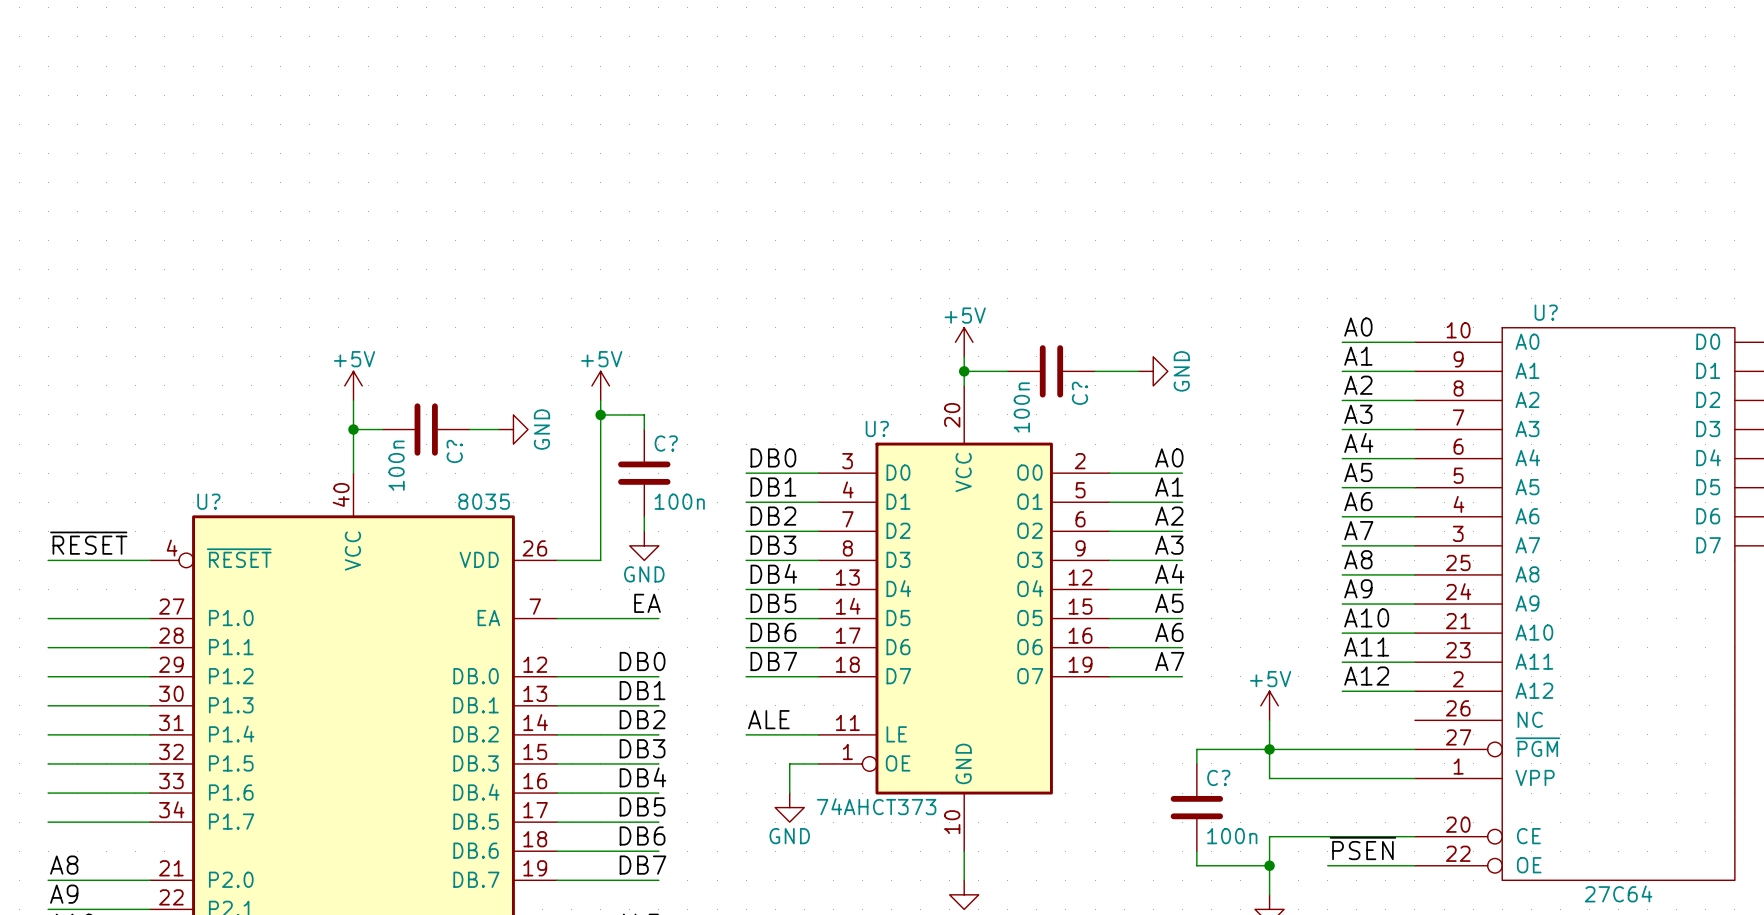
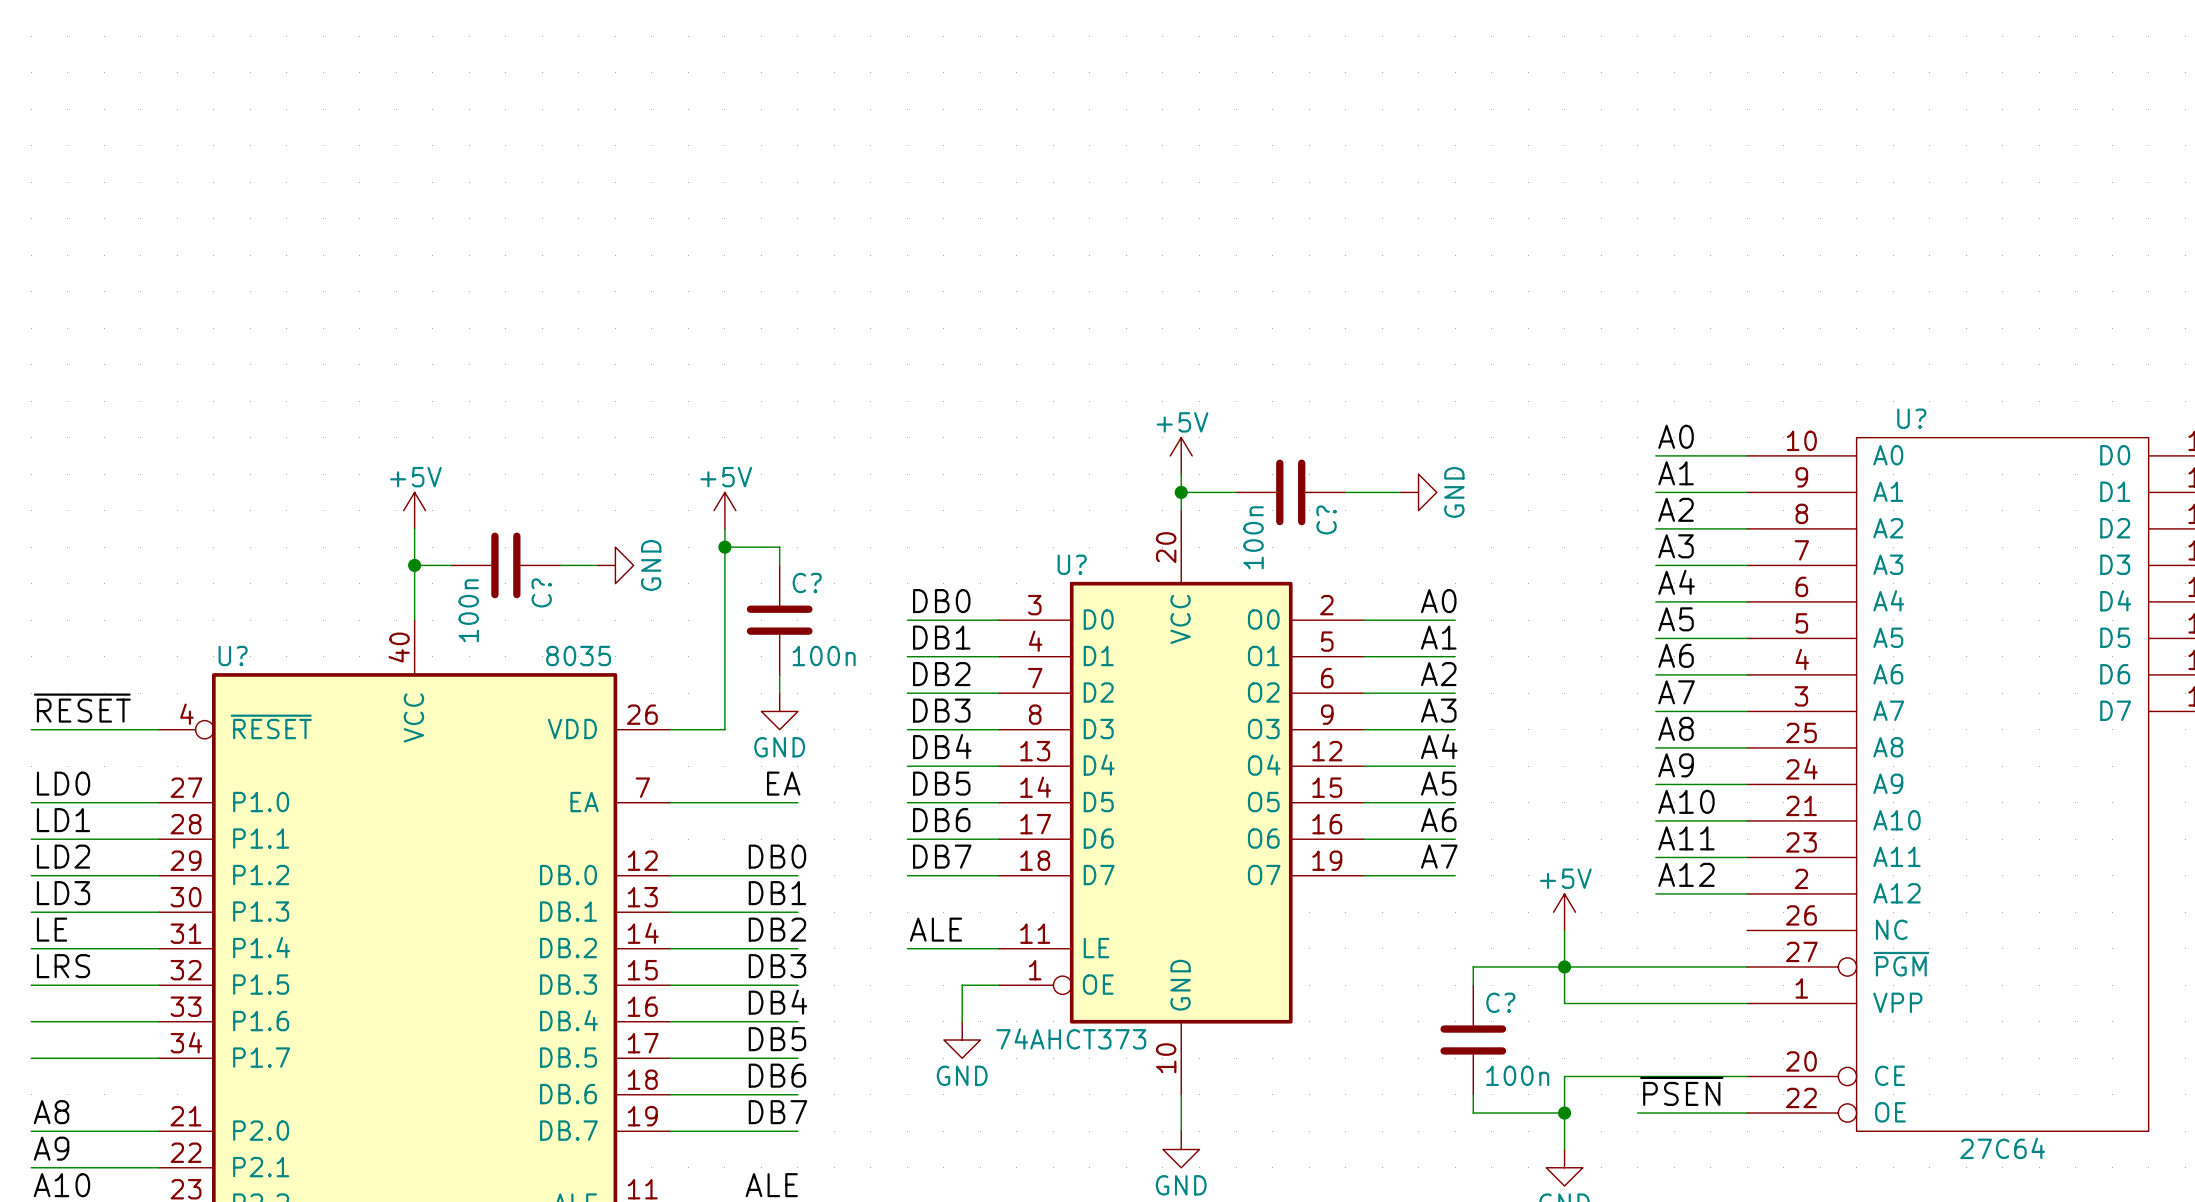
label: none -> LD0 (63, 783)
label: none -> LD1 (63, 820)
label: none -> LD2 (63, 856)
label: none -> LD3 (63, 893)
label: none -> LE (52, 929)
label: none -> LRS (63, 966)

